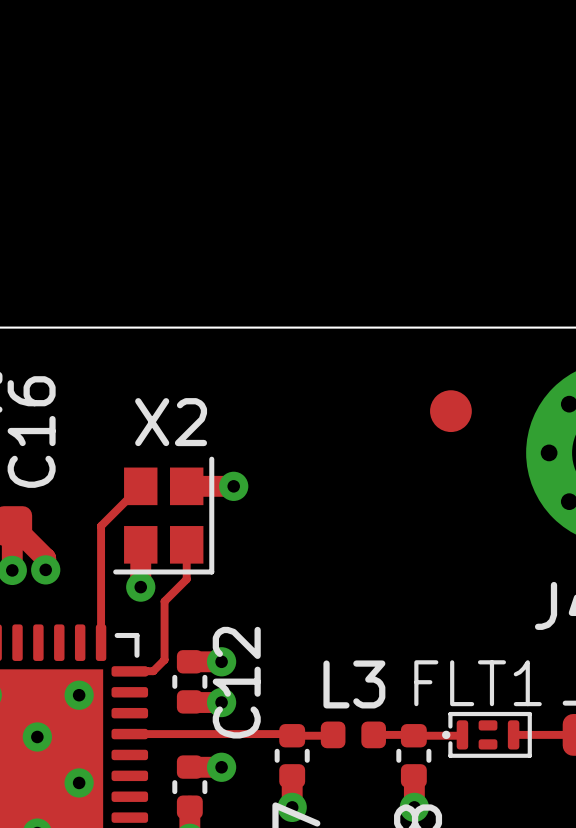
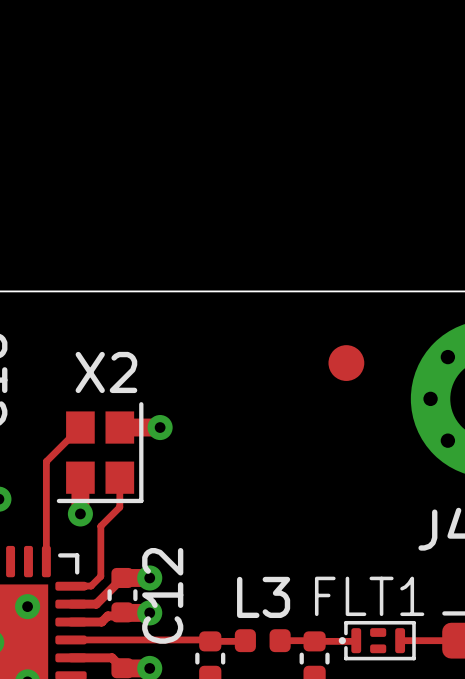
track: none -> (122, 582) (118, 582) (96, 604) (71, 604)
track: none -> (122, 615) (107, 615) (101, 622) (71, 622)
track: none -> (71, 657) (112, 657) (122, 668)

